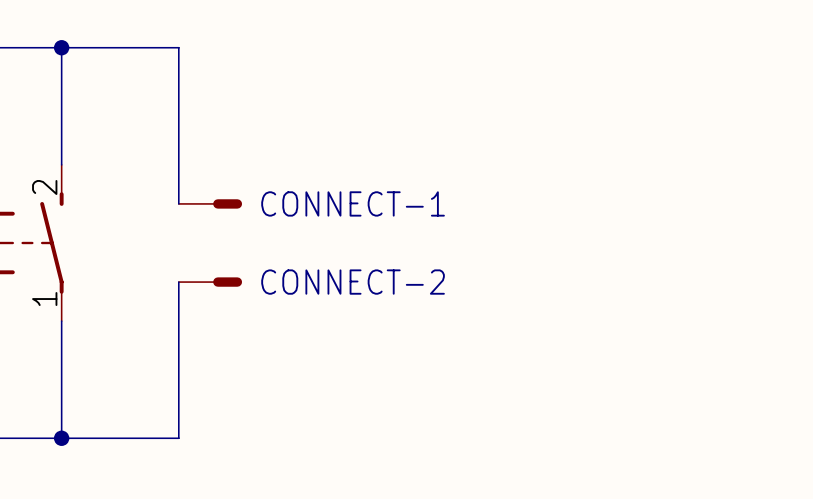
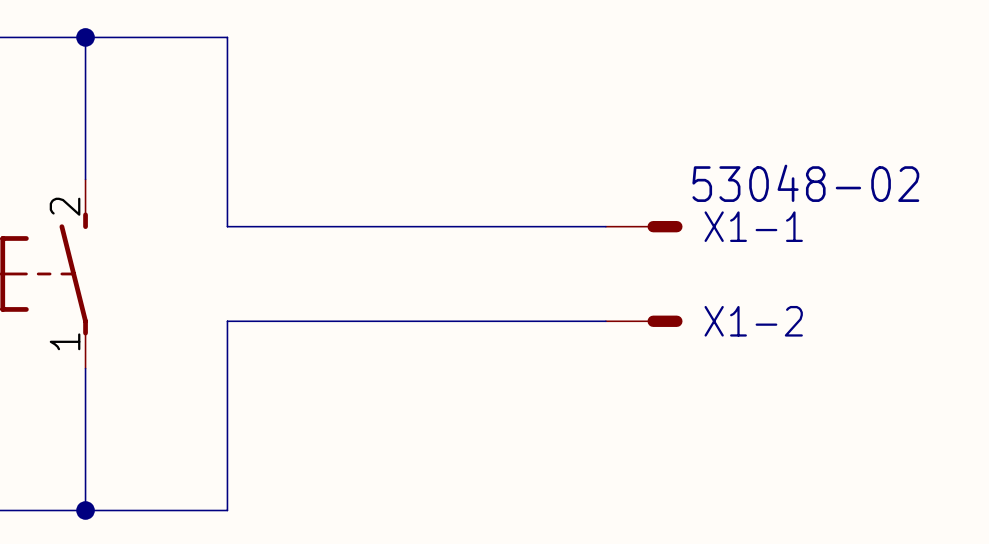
wire: none -> (227, 226) (605, 226)
CONNECT-1: (210, 203) -> none
X1-1: none -> 53048-02 (644, 226)
wire: none -> (227, 321) (605, 321)
CONNECT-2: (210, 282) -> none
X1-2: none -> (644, 321)

